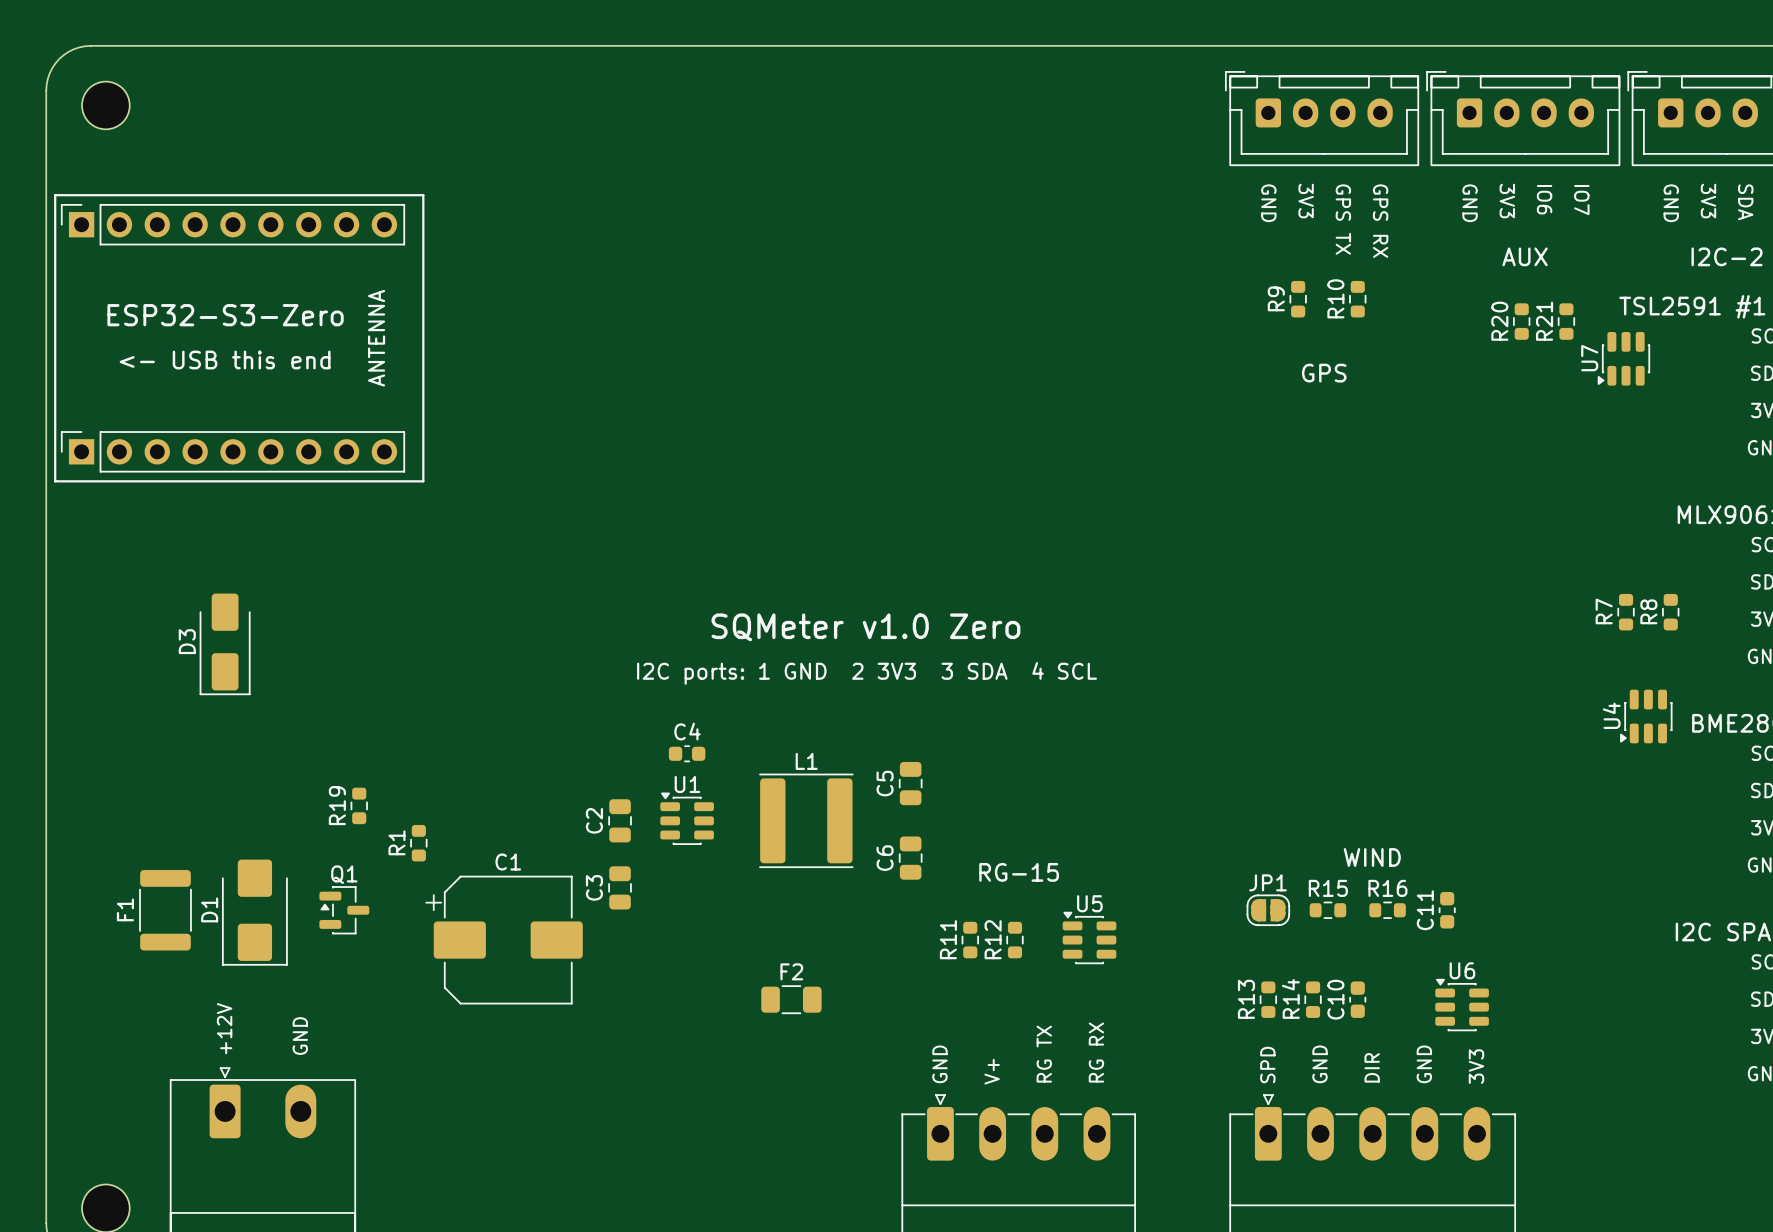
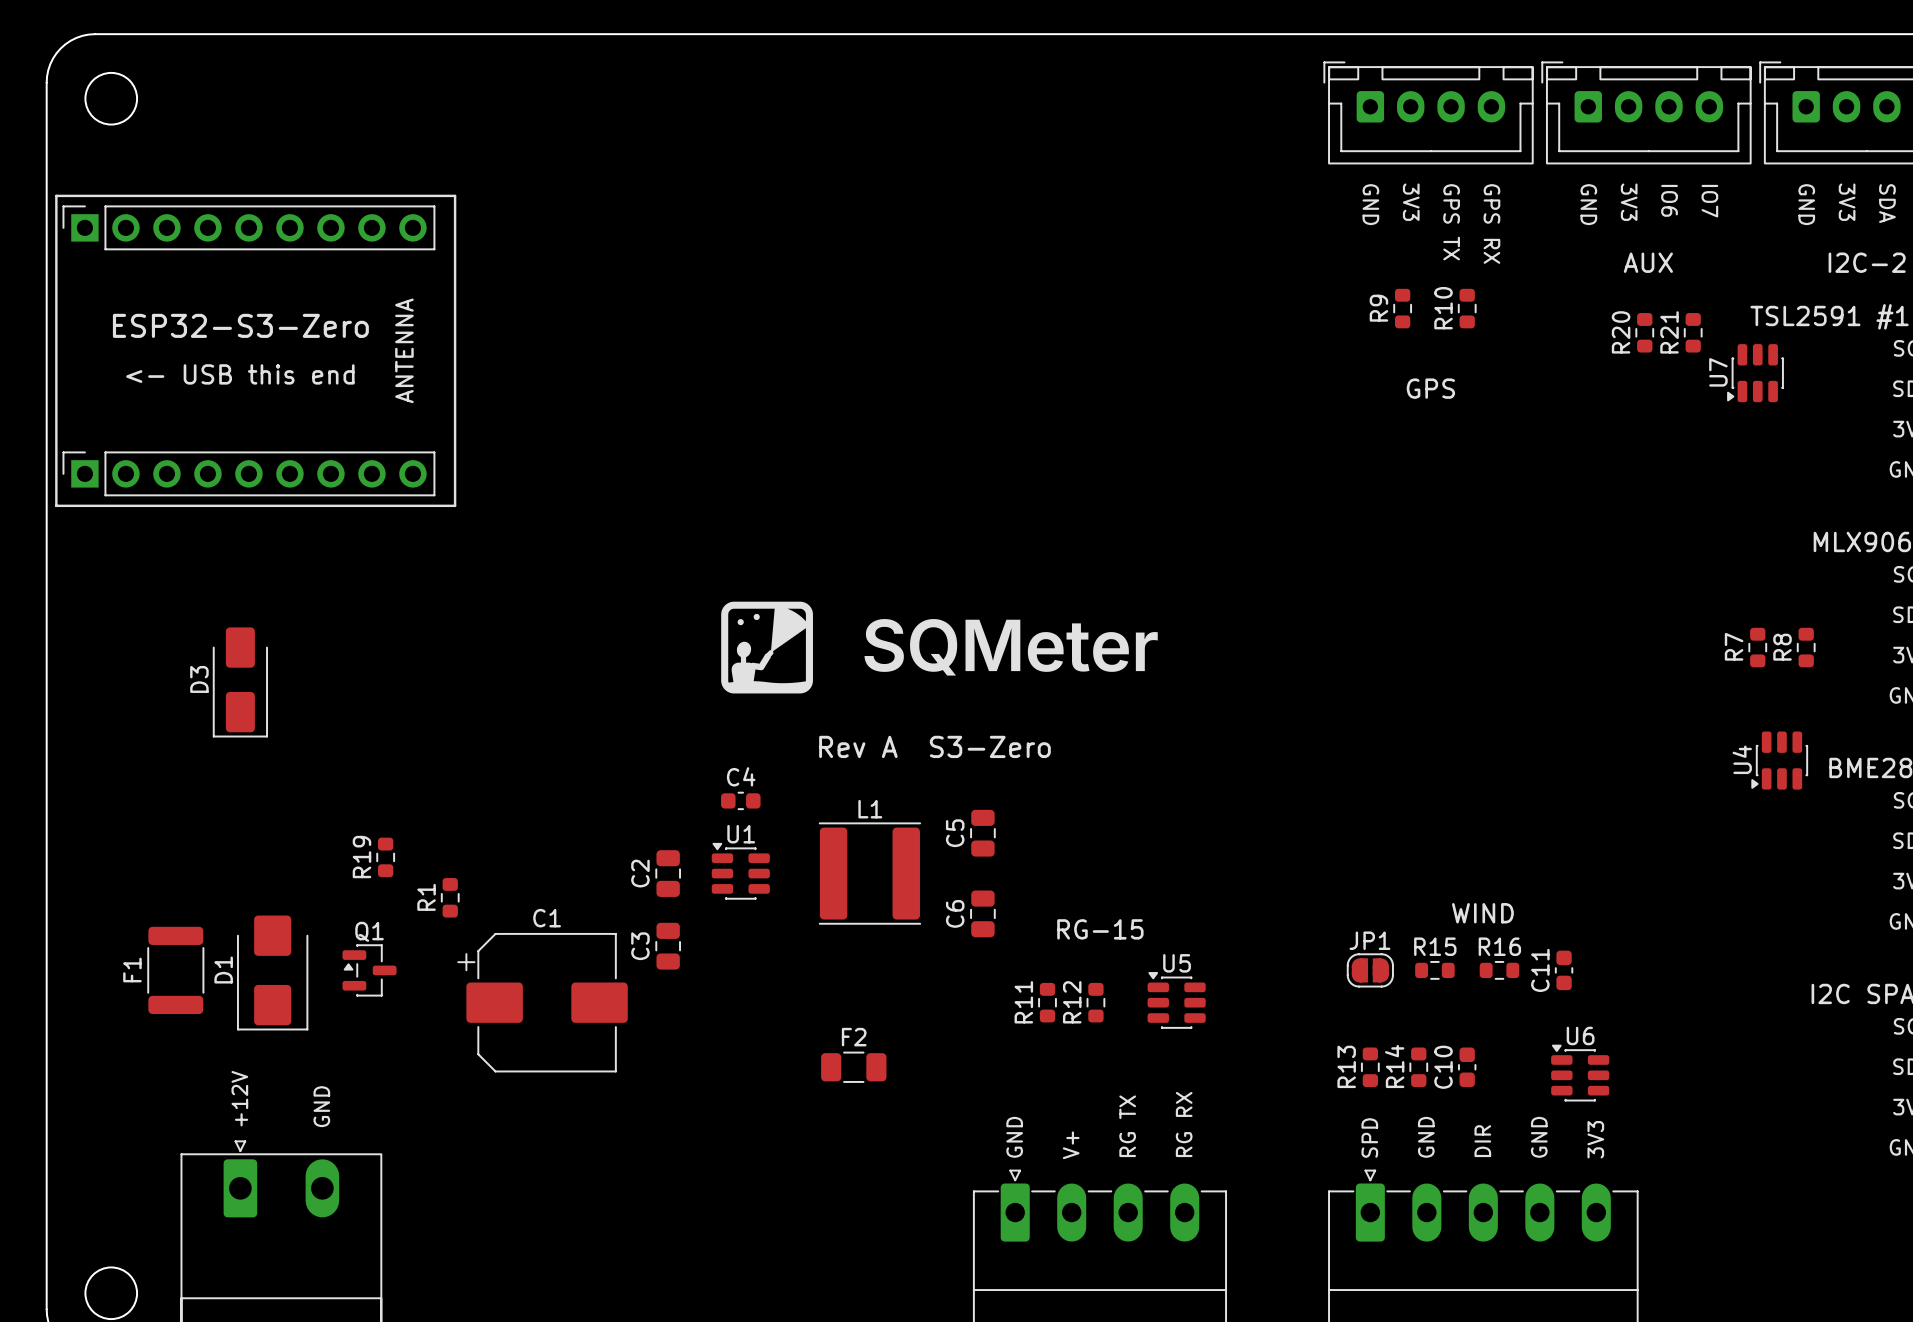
drawing: none -> [721, 601, 813, 694]
drawing: none -> [864, 619, 1158, 676]
text: SQMeter v1.0 Zero (865, 627) -> none
text: I2C ports: 1 GND 2 3V3 3 SDA 4 SCL (867, 673) -> none
text: none -> Rev A S3-Zero (934, 746)

